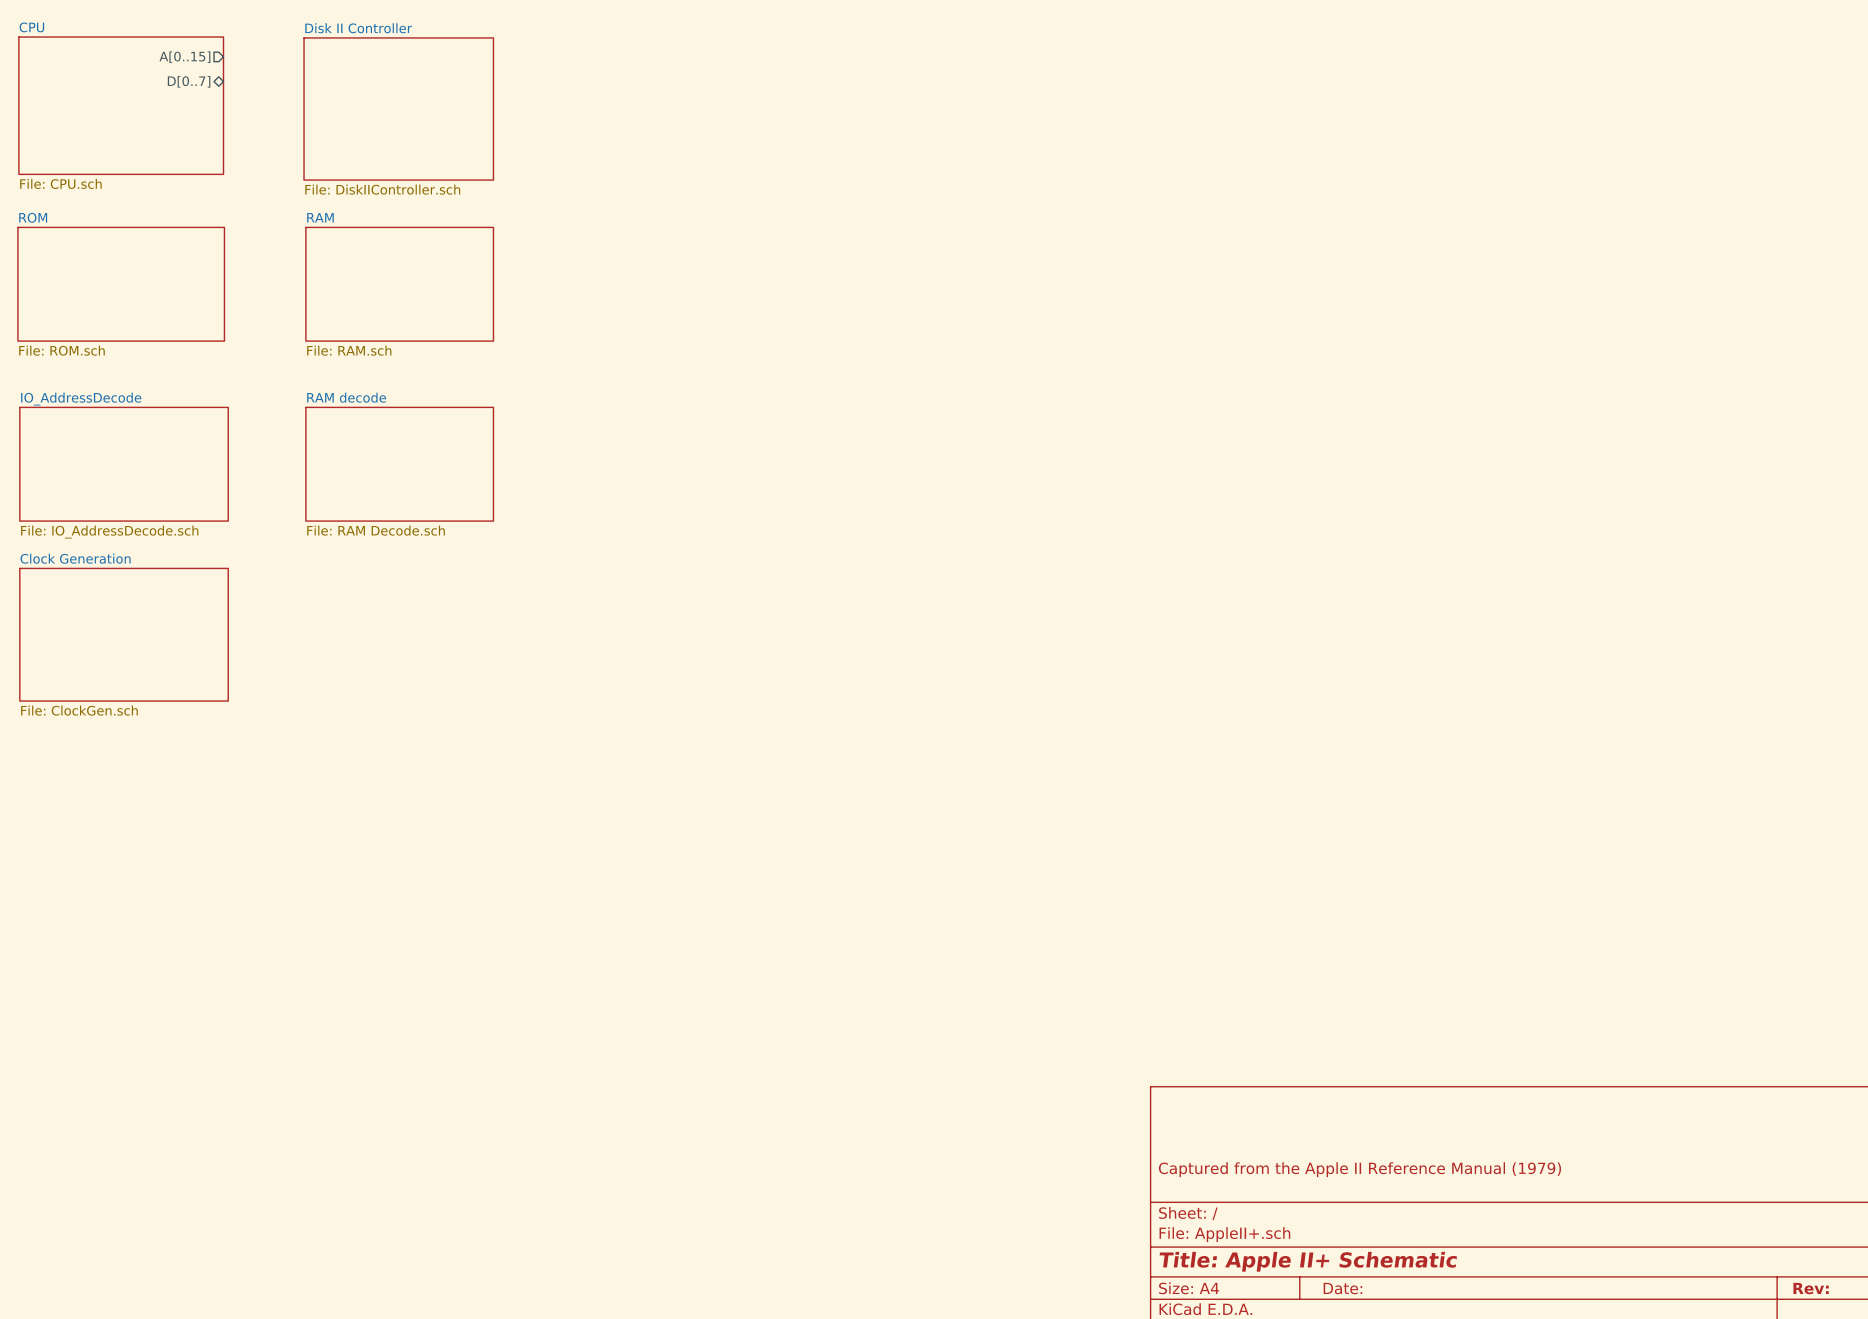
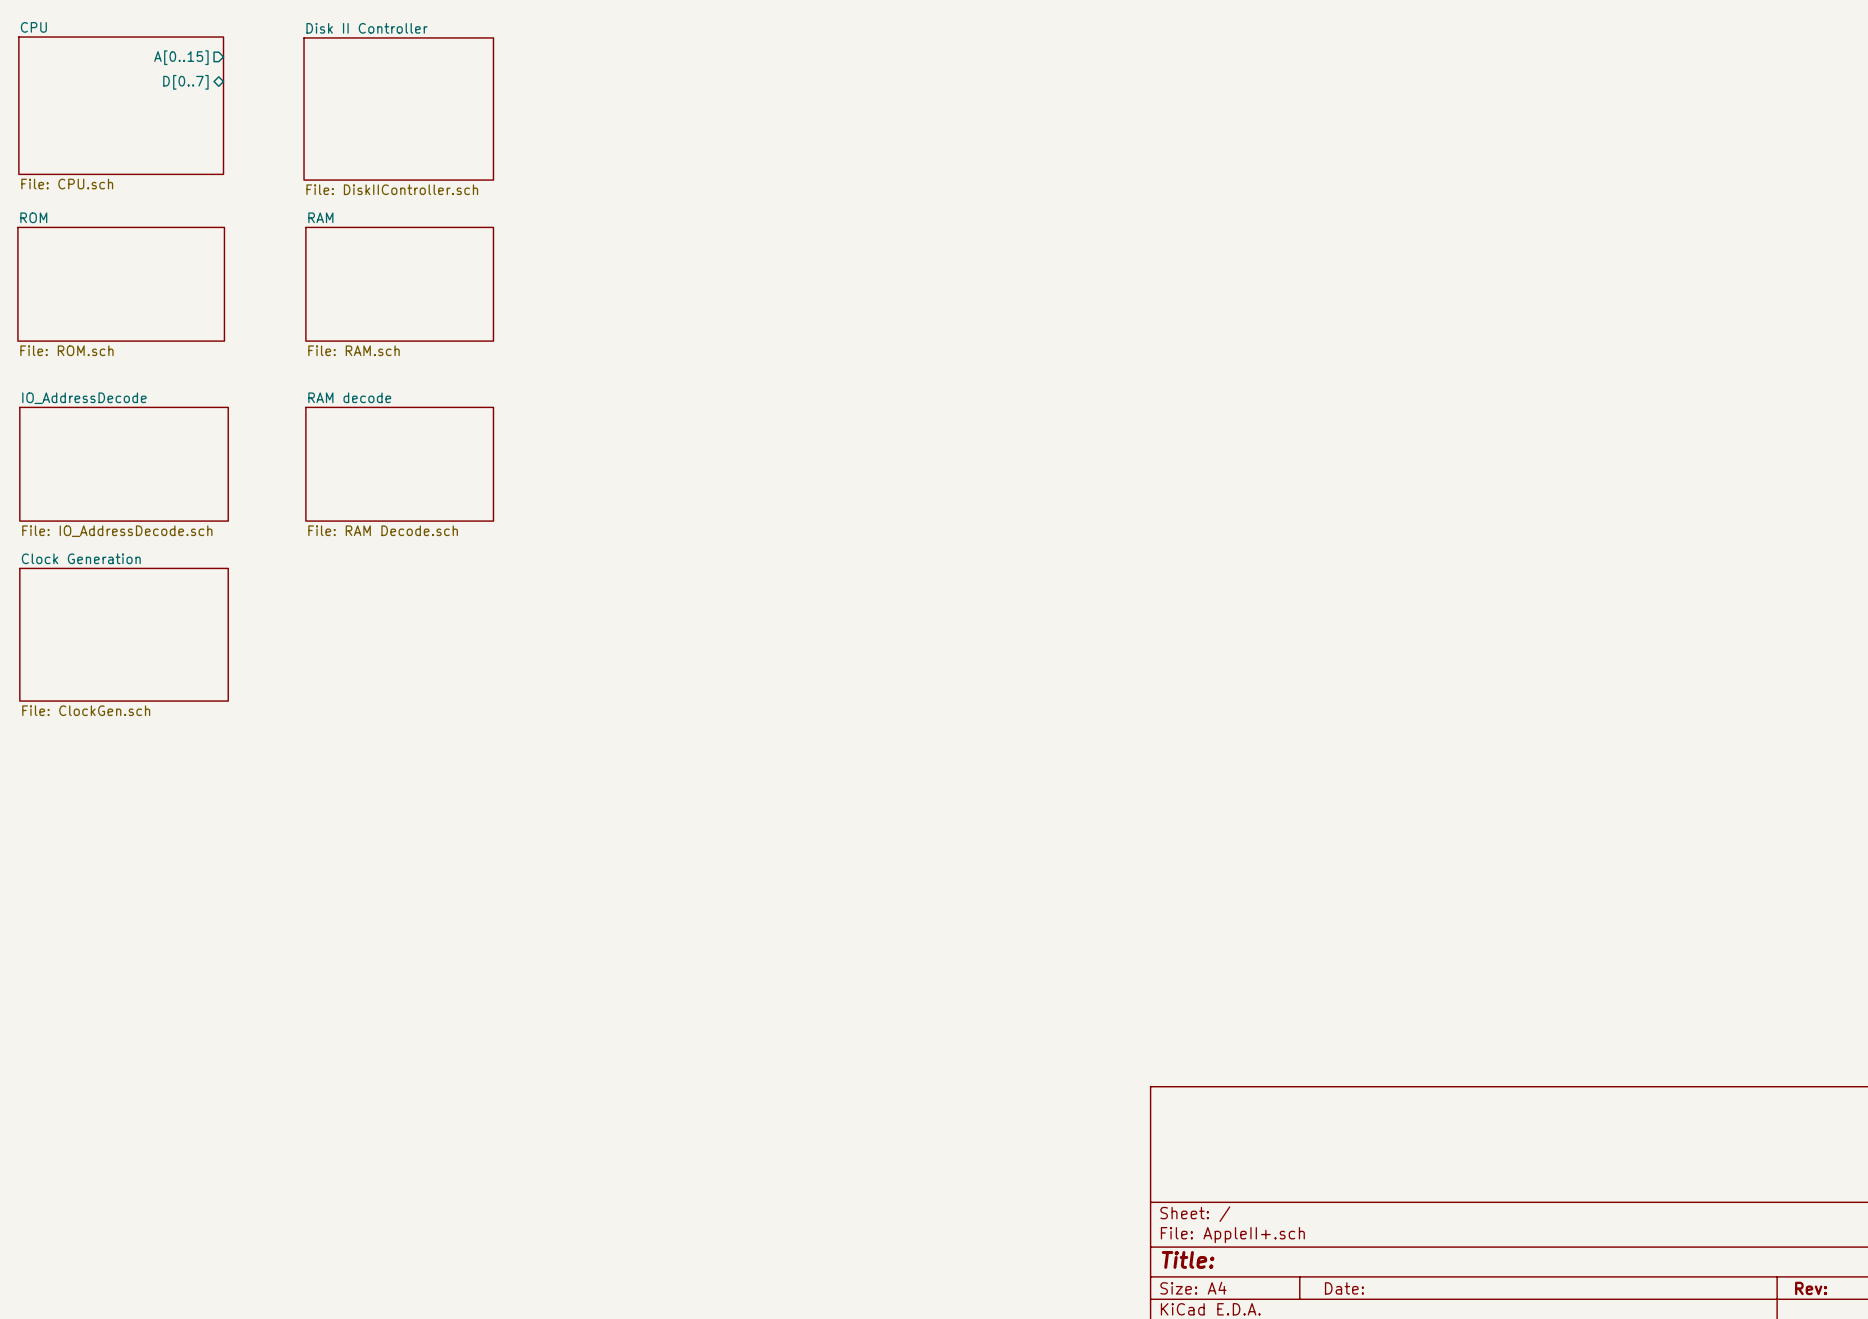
title block: Captured from the Apple II Reference Manual (1979) (1359, 1169) -> none
title block: Title: Apple II+ Schematic (1308, 1261) -> Title: (1188, 1259)

